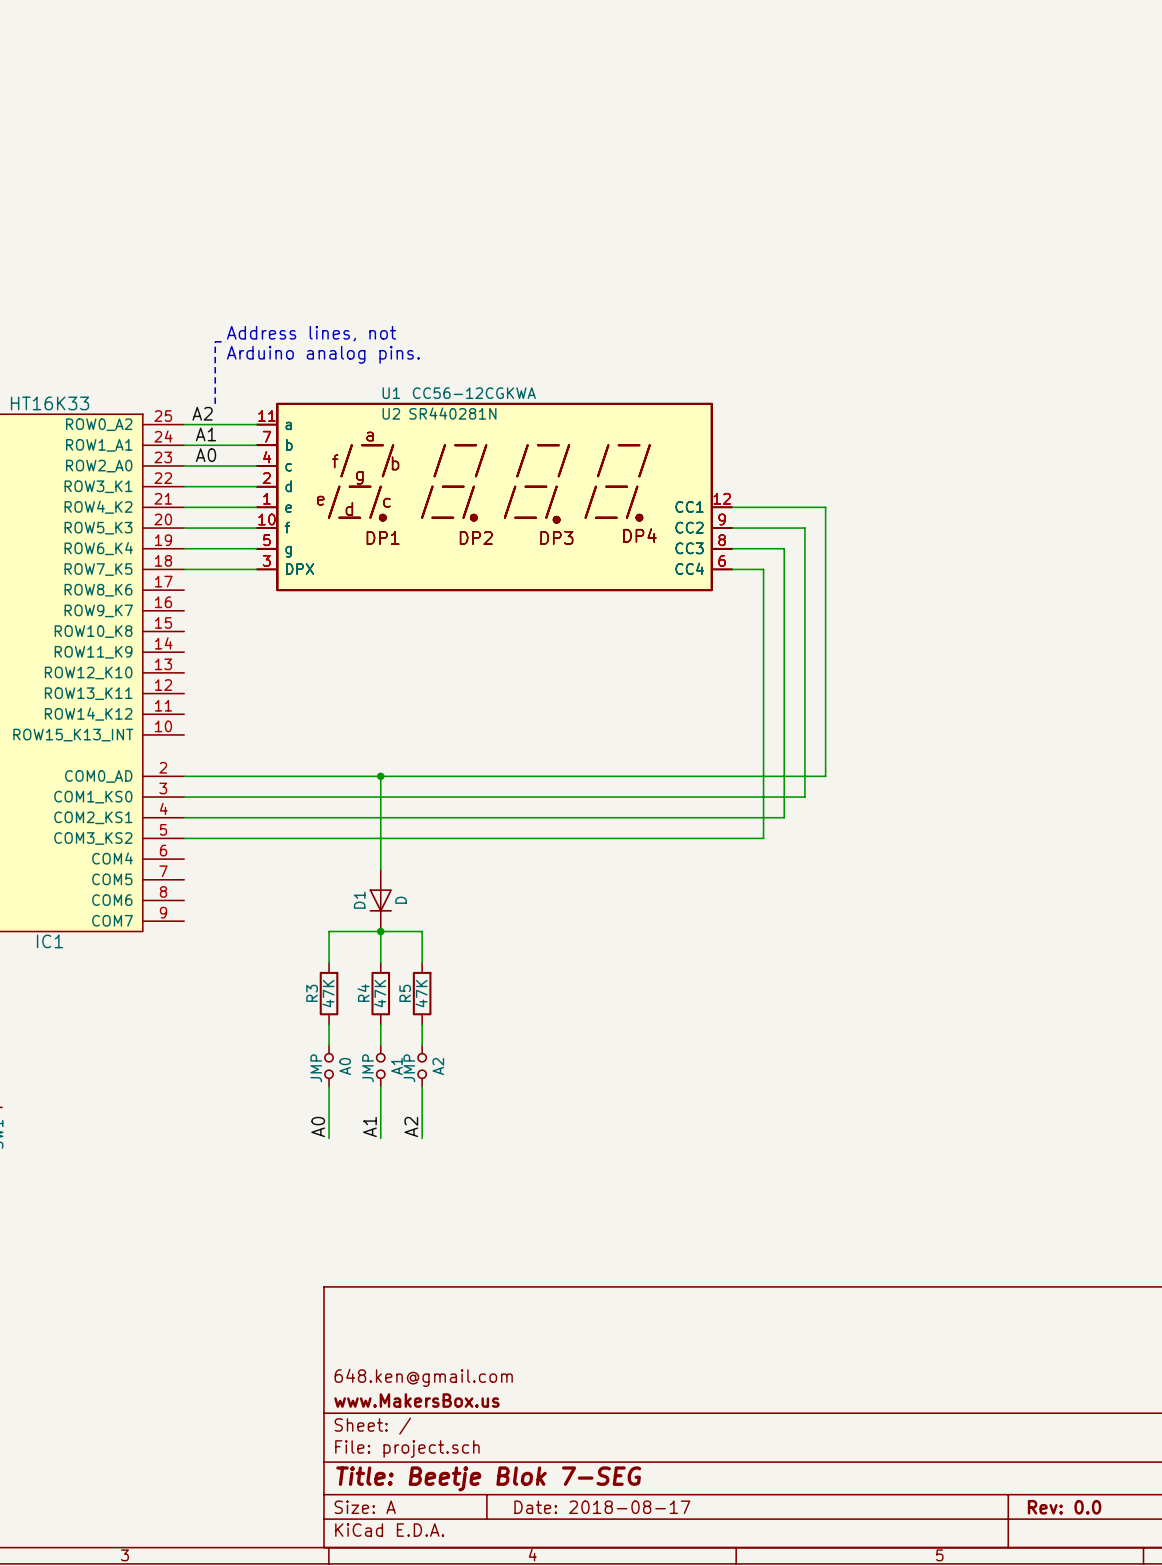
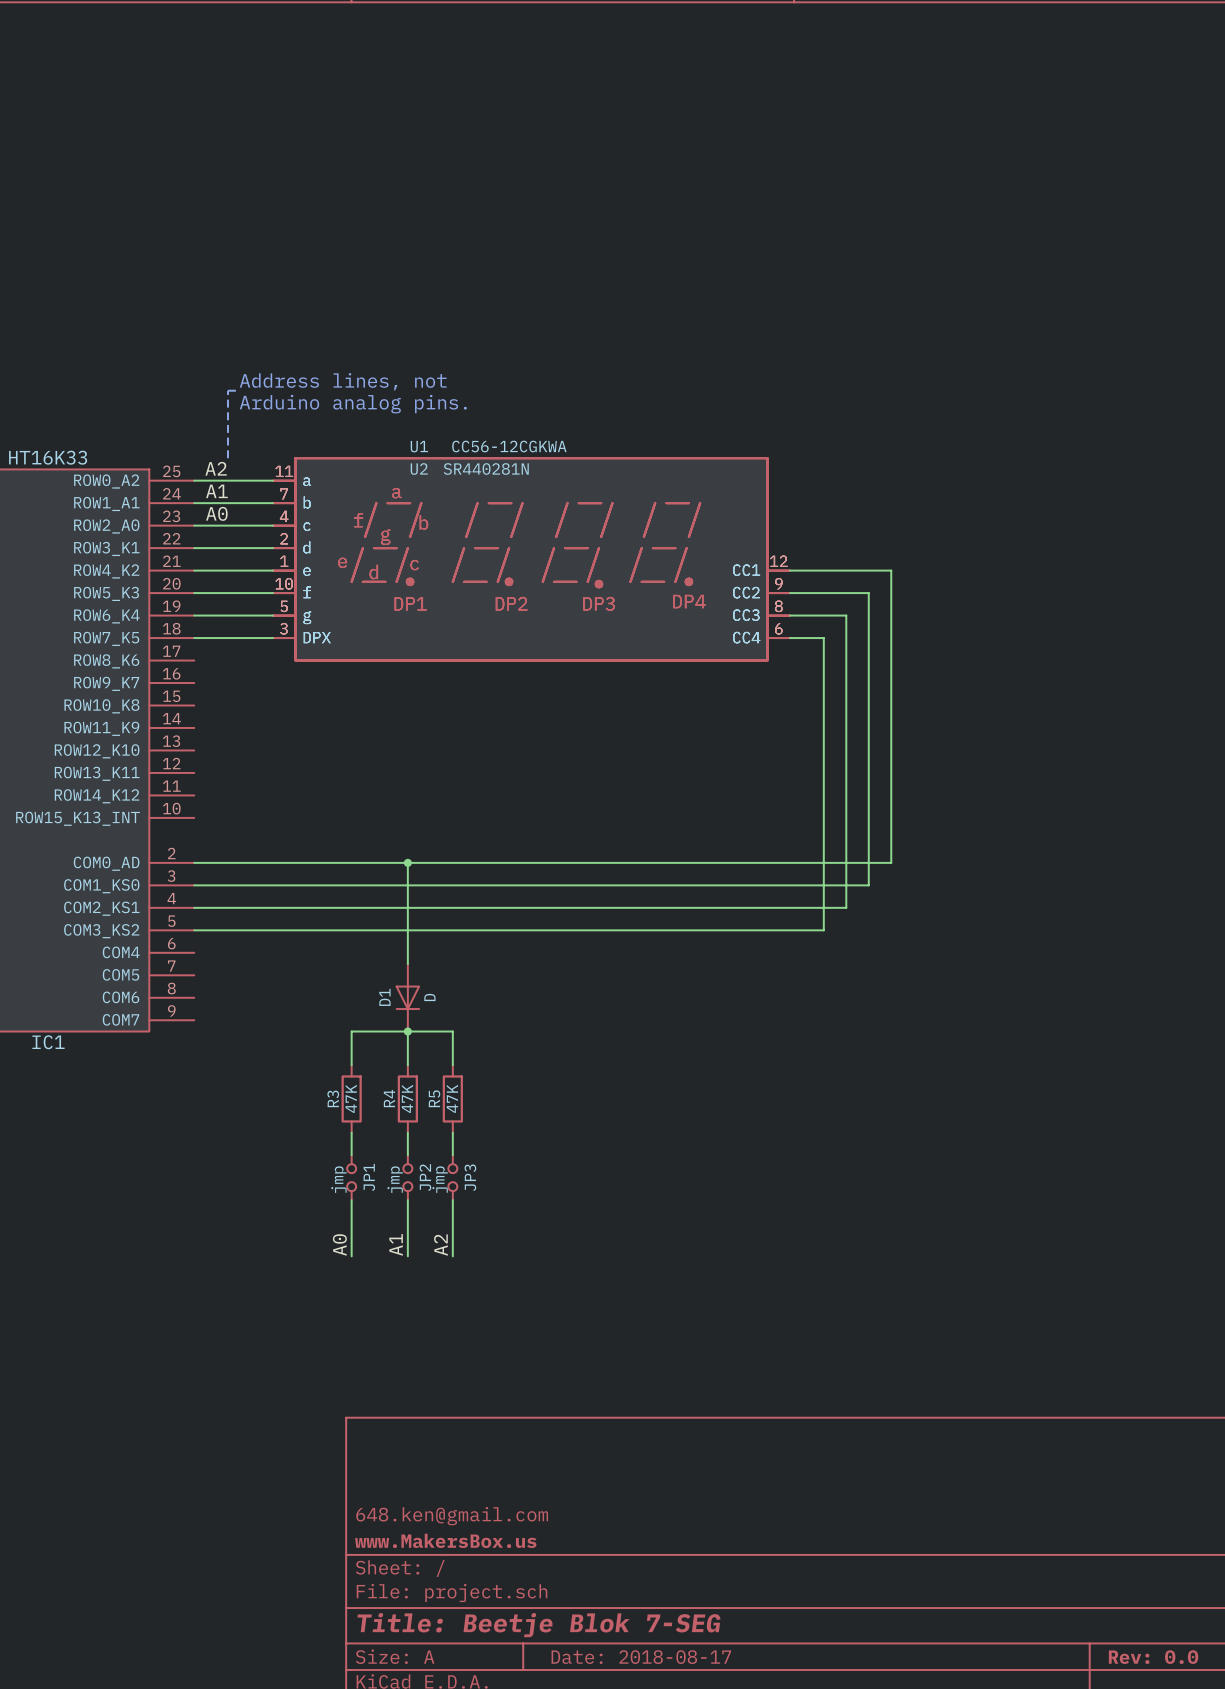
A0 name: A0 (345, 1066) -> JP1 (369, 1177)
A1 name: A1 (396, 1066) -> JP2 (425, 1177)
A2 name: A2 (438, 1066) -> JP3 (470, 1177)
A0 value: JMP (316, 1068) -> jmp (338, 1179)
A1 value: JMP (367, 1068) -> jmp (395, 1179)
A2 value: JMP (409, 1068) -> jmp (440, 1179)

